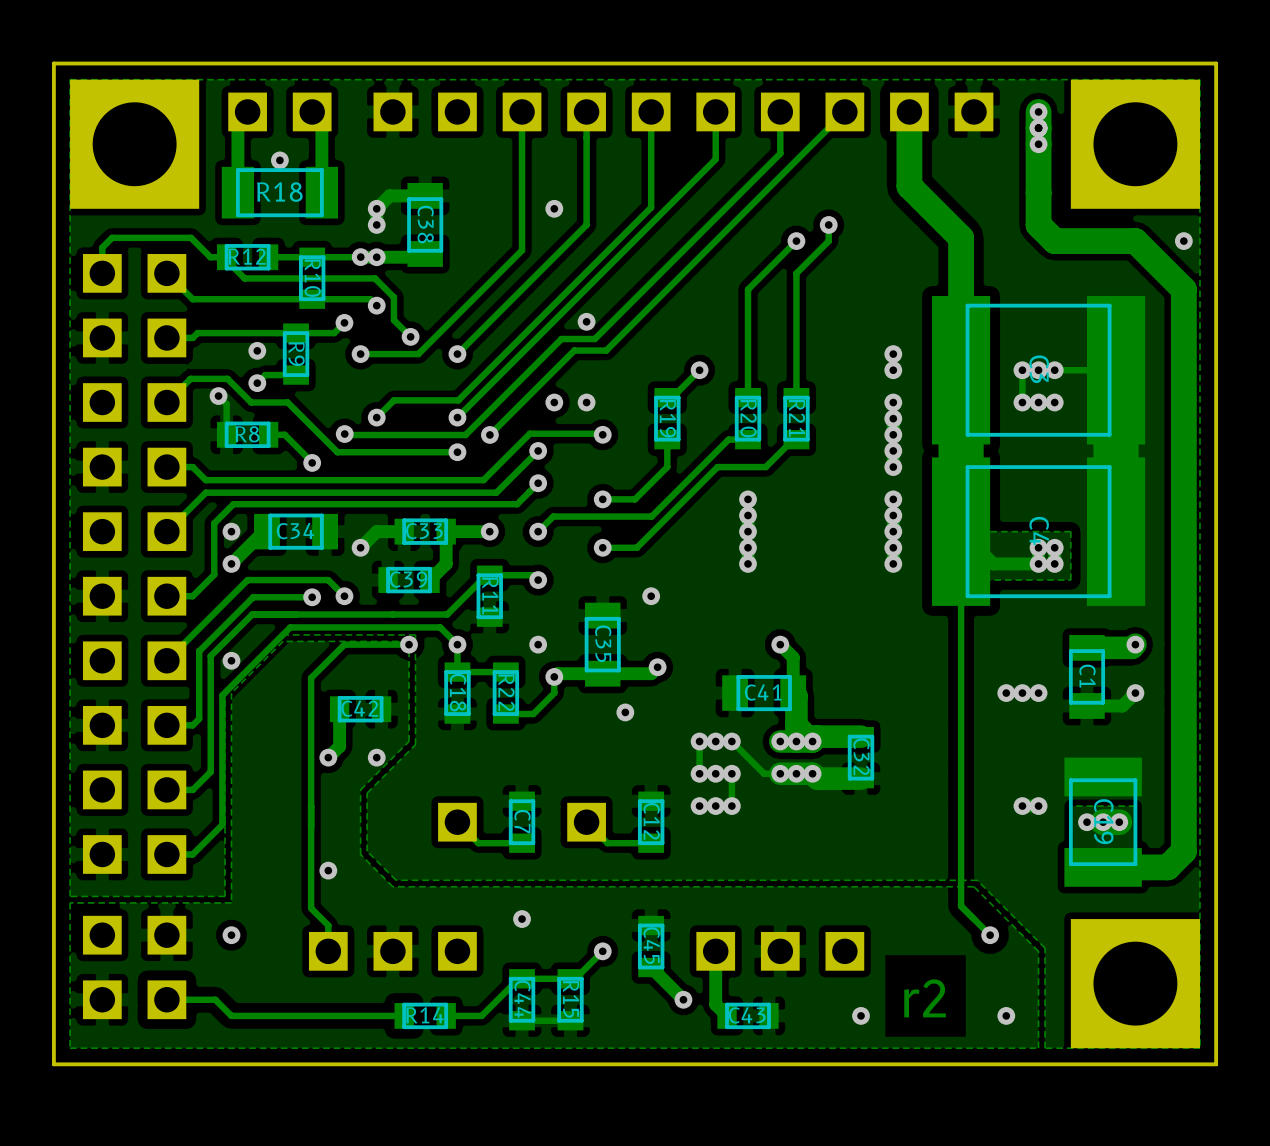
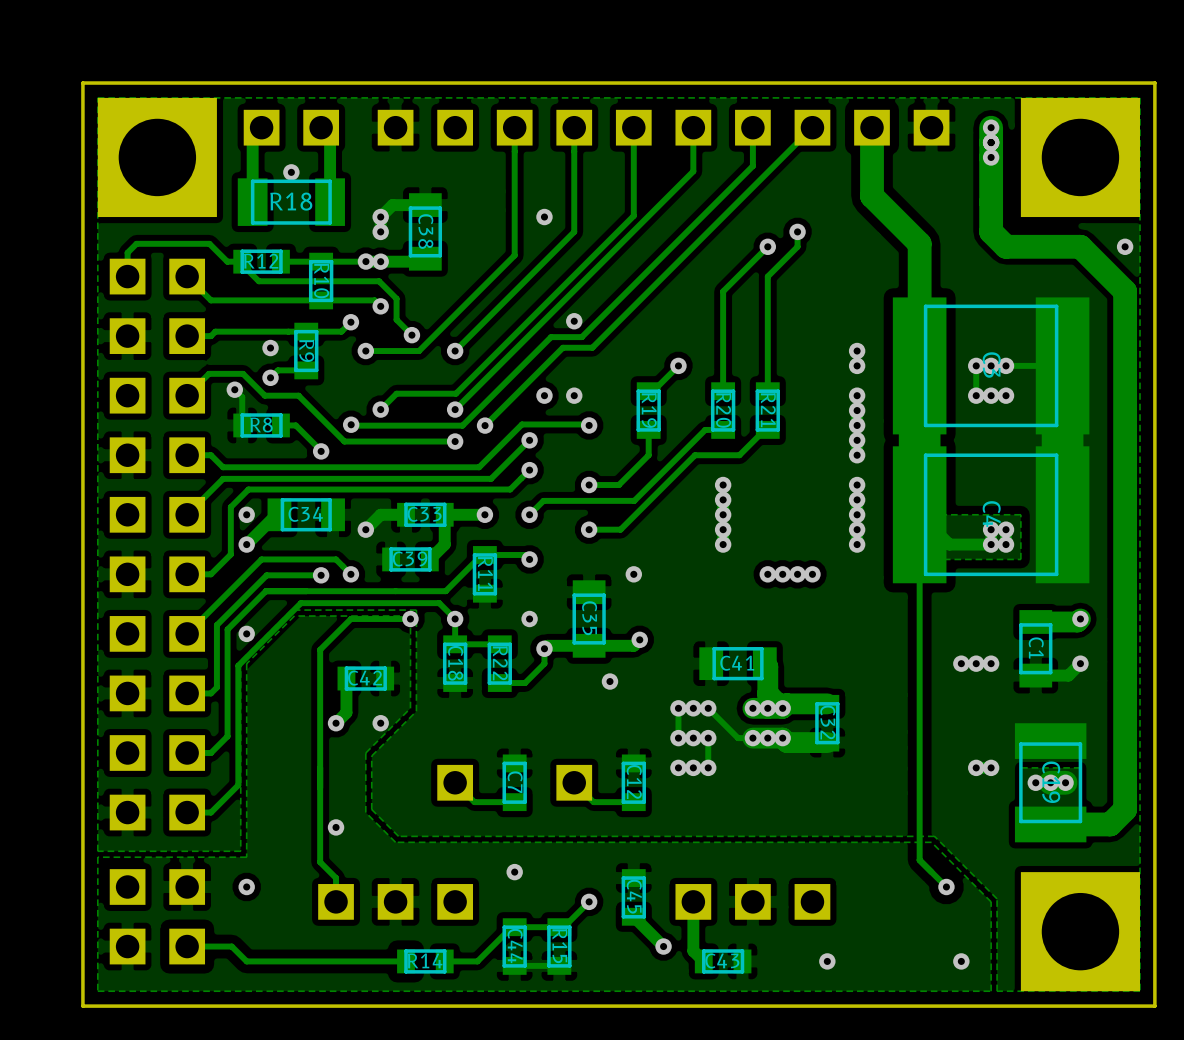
via: none -> (767, 574)
via: none -> (782, 574)
via: none -> (797, 574)
via: none -> (812, 574)
track: (780, 644) (793, 657) (793, 693) -> none
via: (780, 644) -> none
text: r2 (925, 998) -> none

